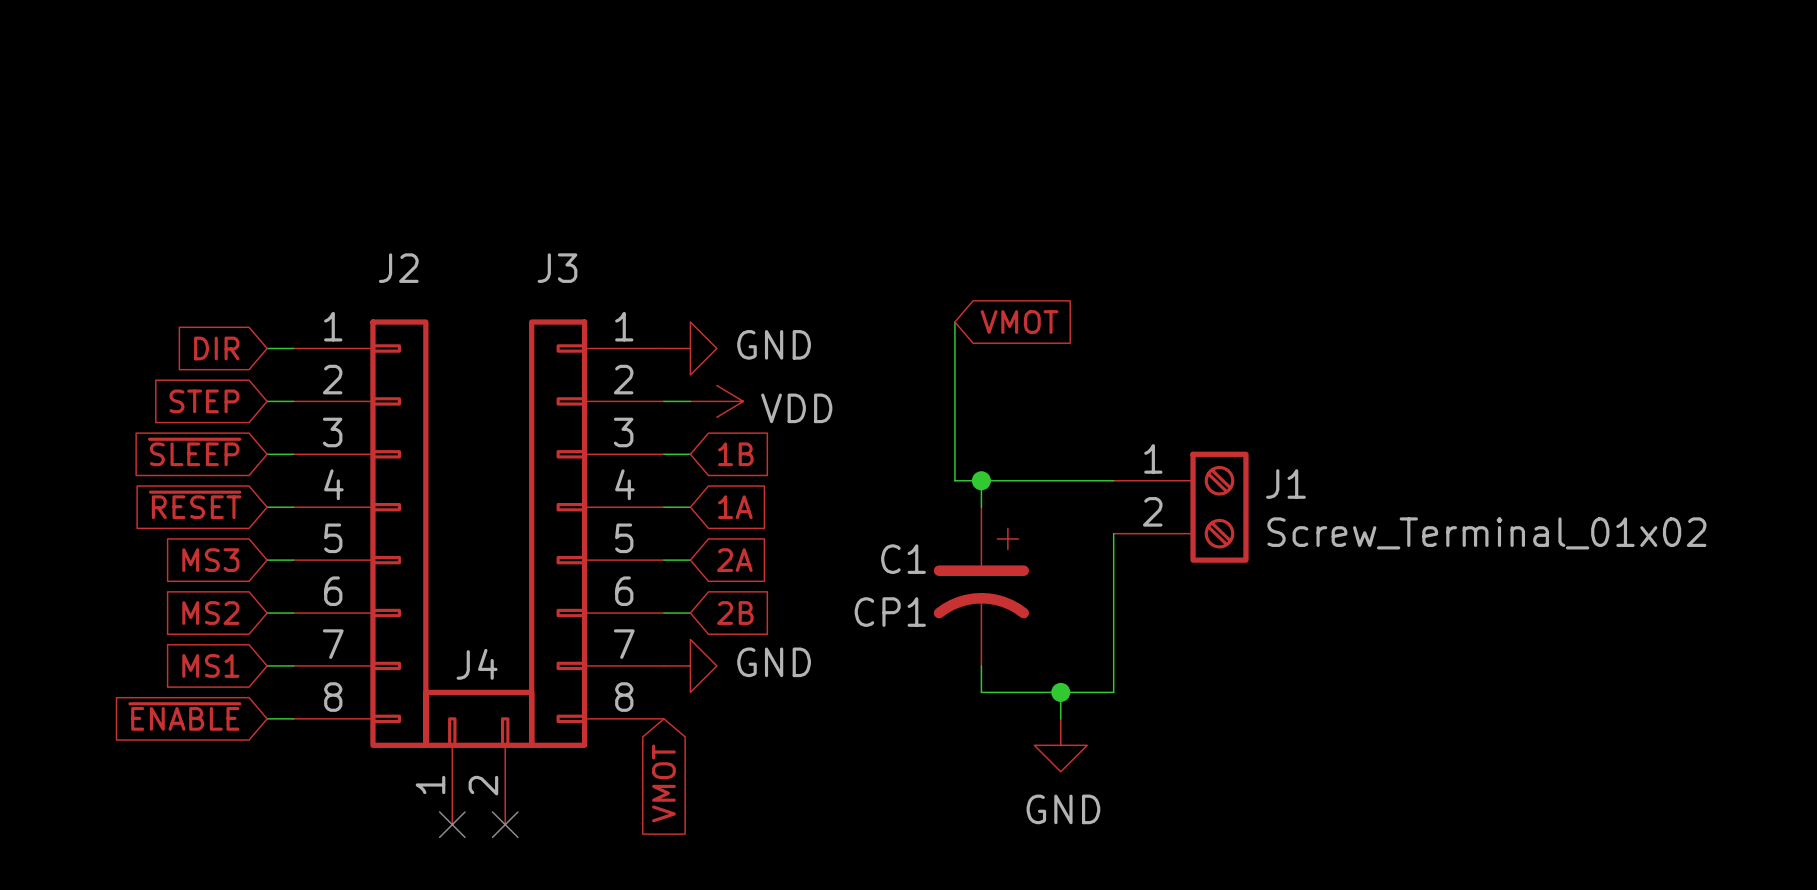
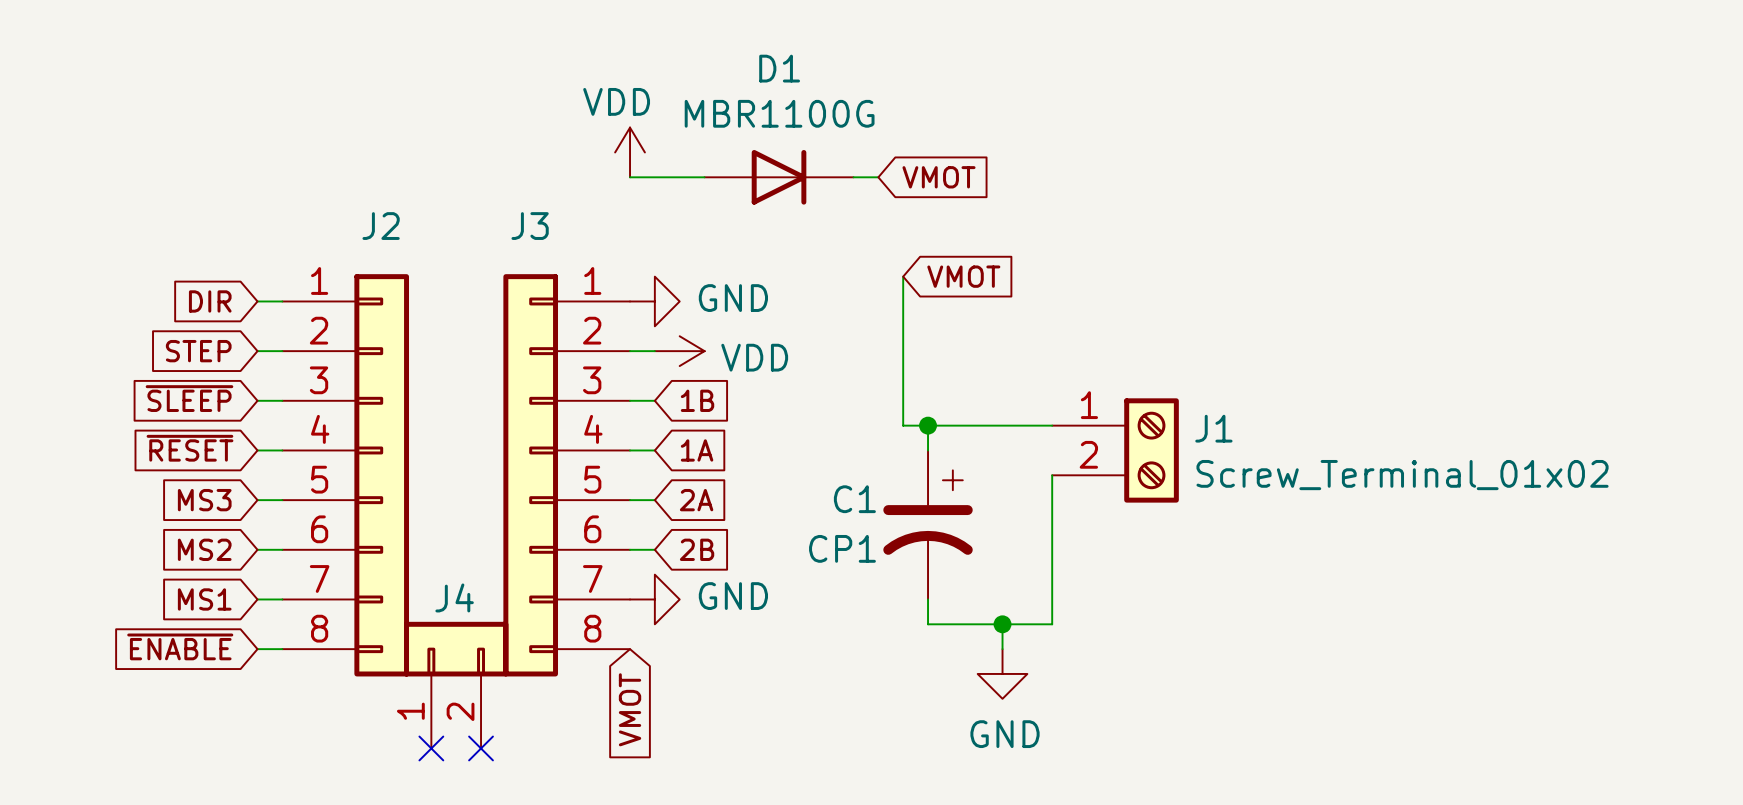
power symbol: none -> VDD (630, 152)
wire: none -> (630, 177) (704, 177)
D1: none -> MBR1100G (779, 177)
wire: none -> (853, 177) (878, 177)
global label: none -> VMOT (939, 177)

